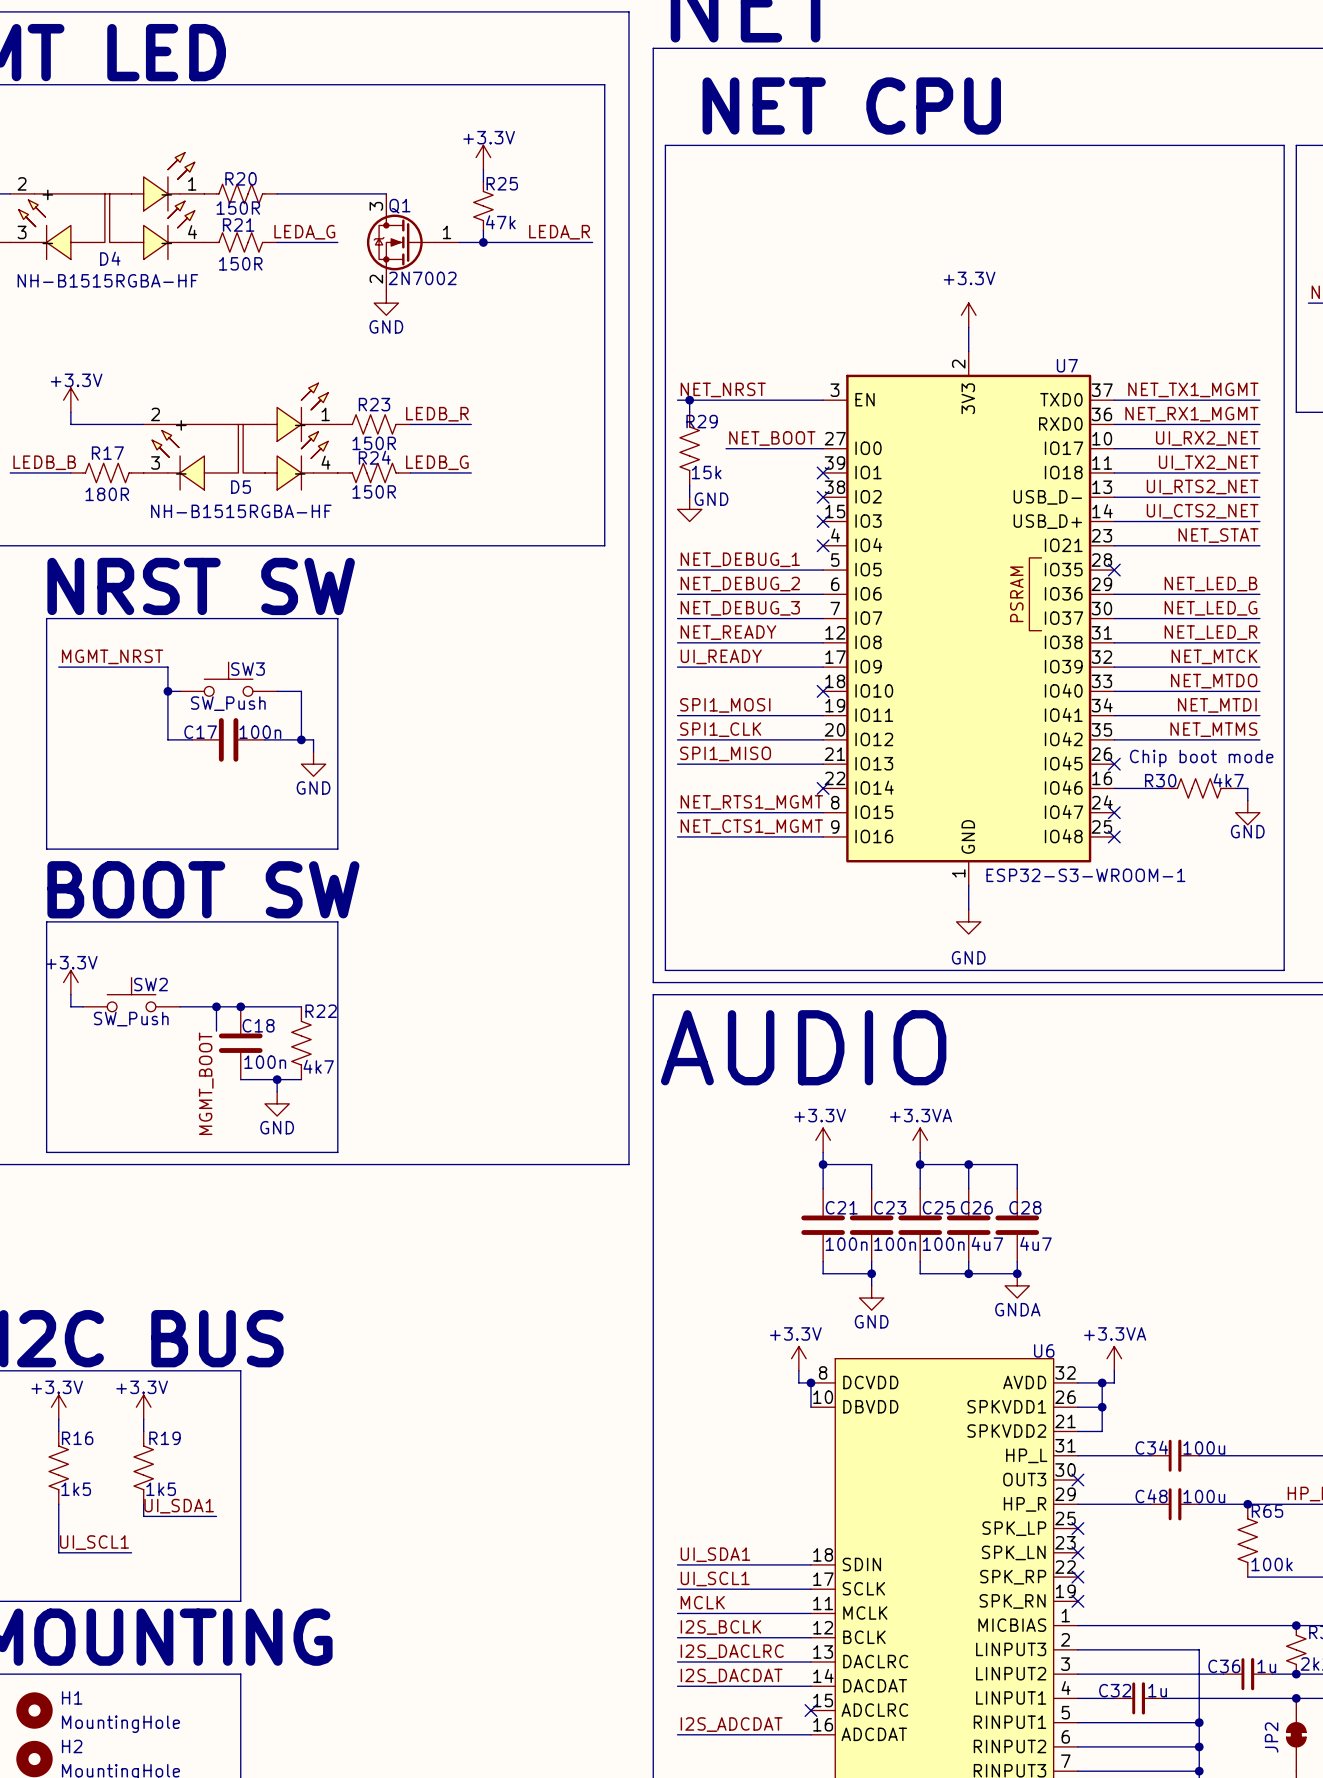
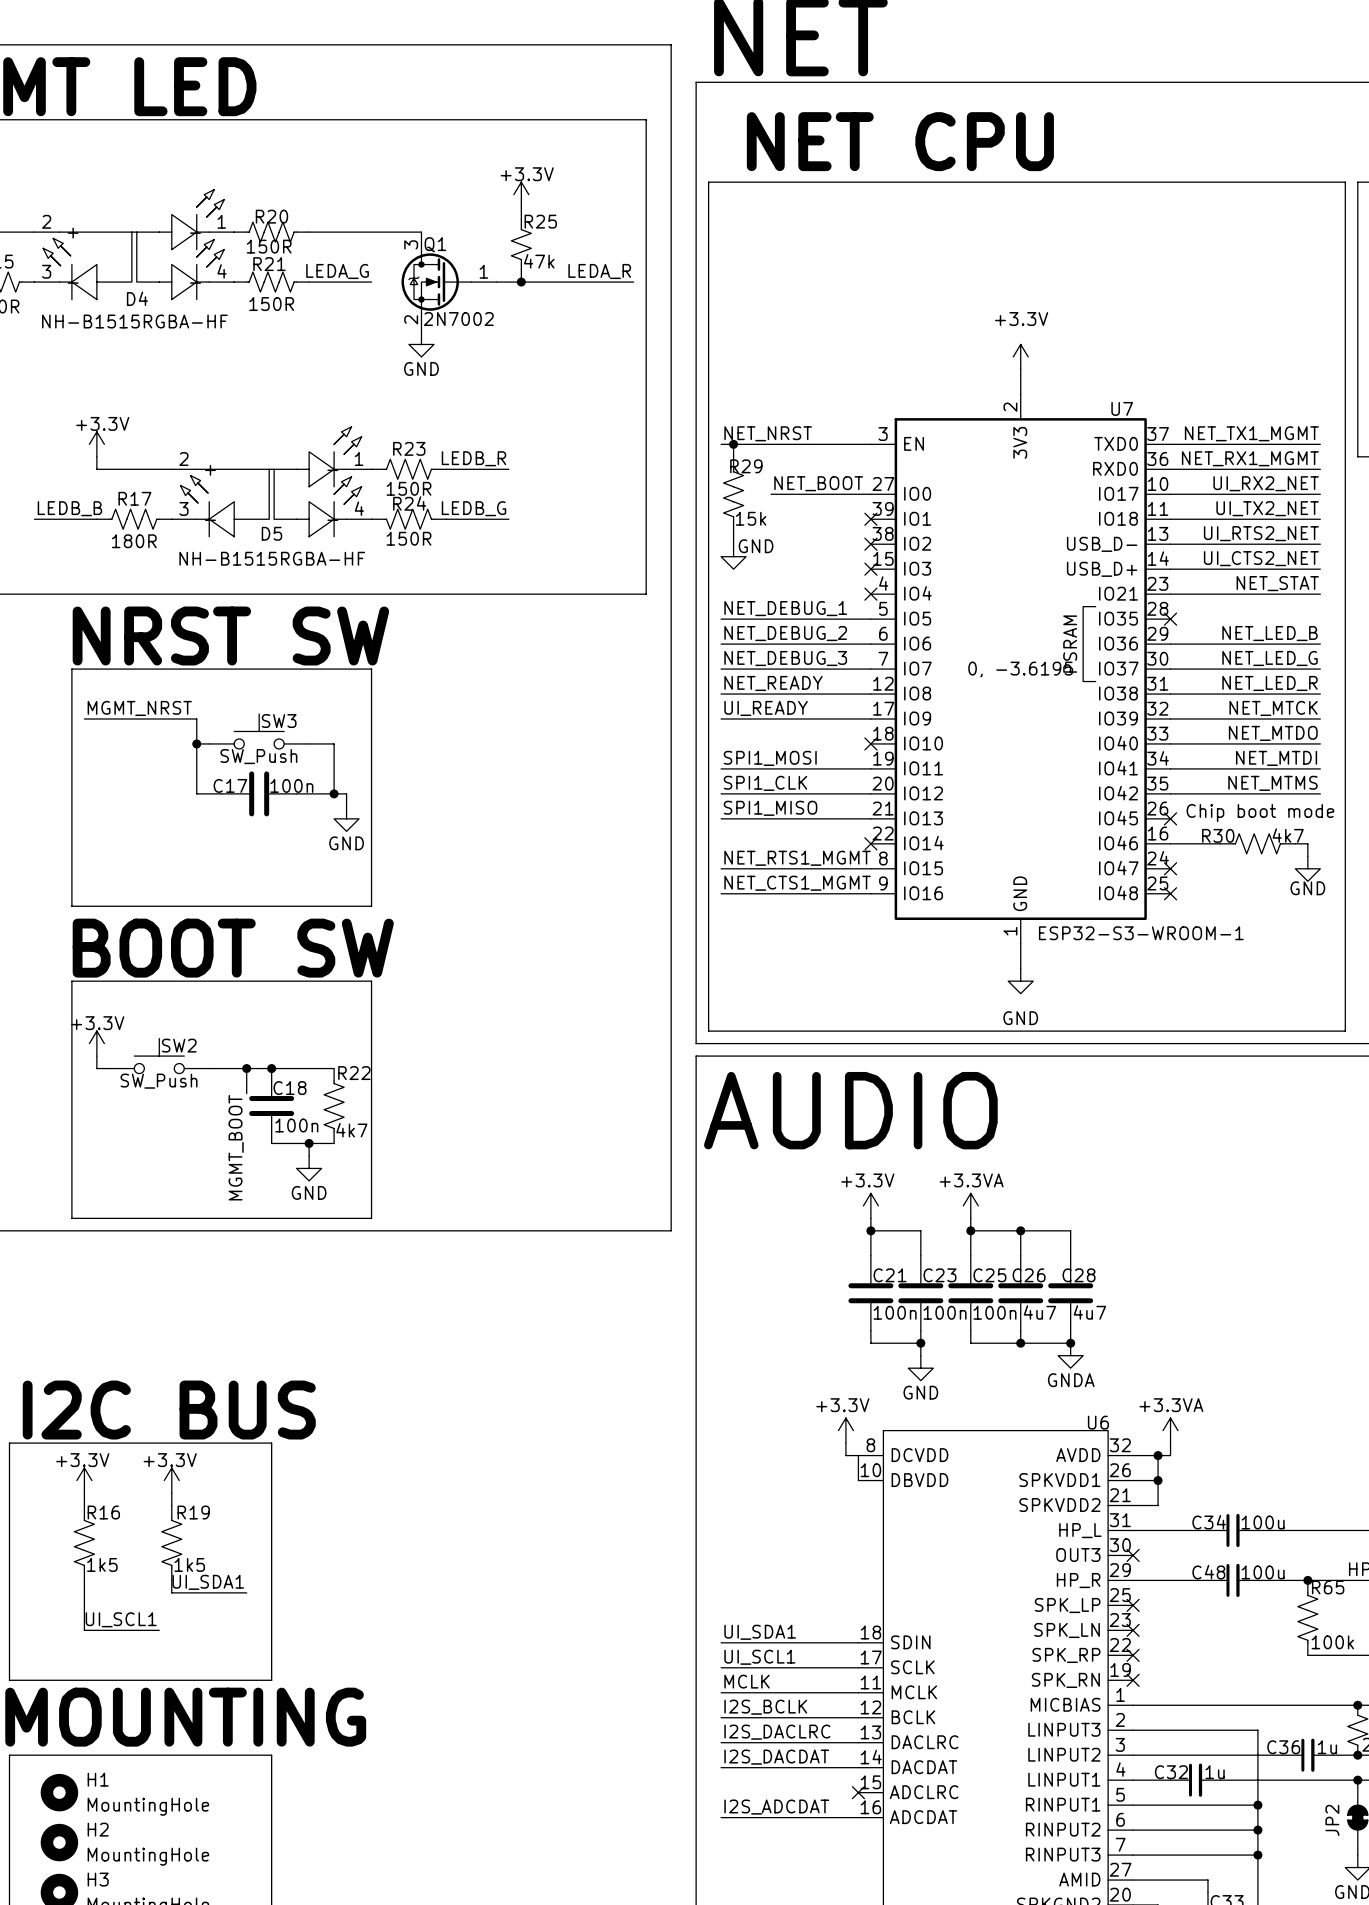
U7 text: none -> 0, -3.6195 (1020, 669)
junction: (810, 1382) -> none

